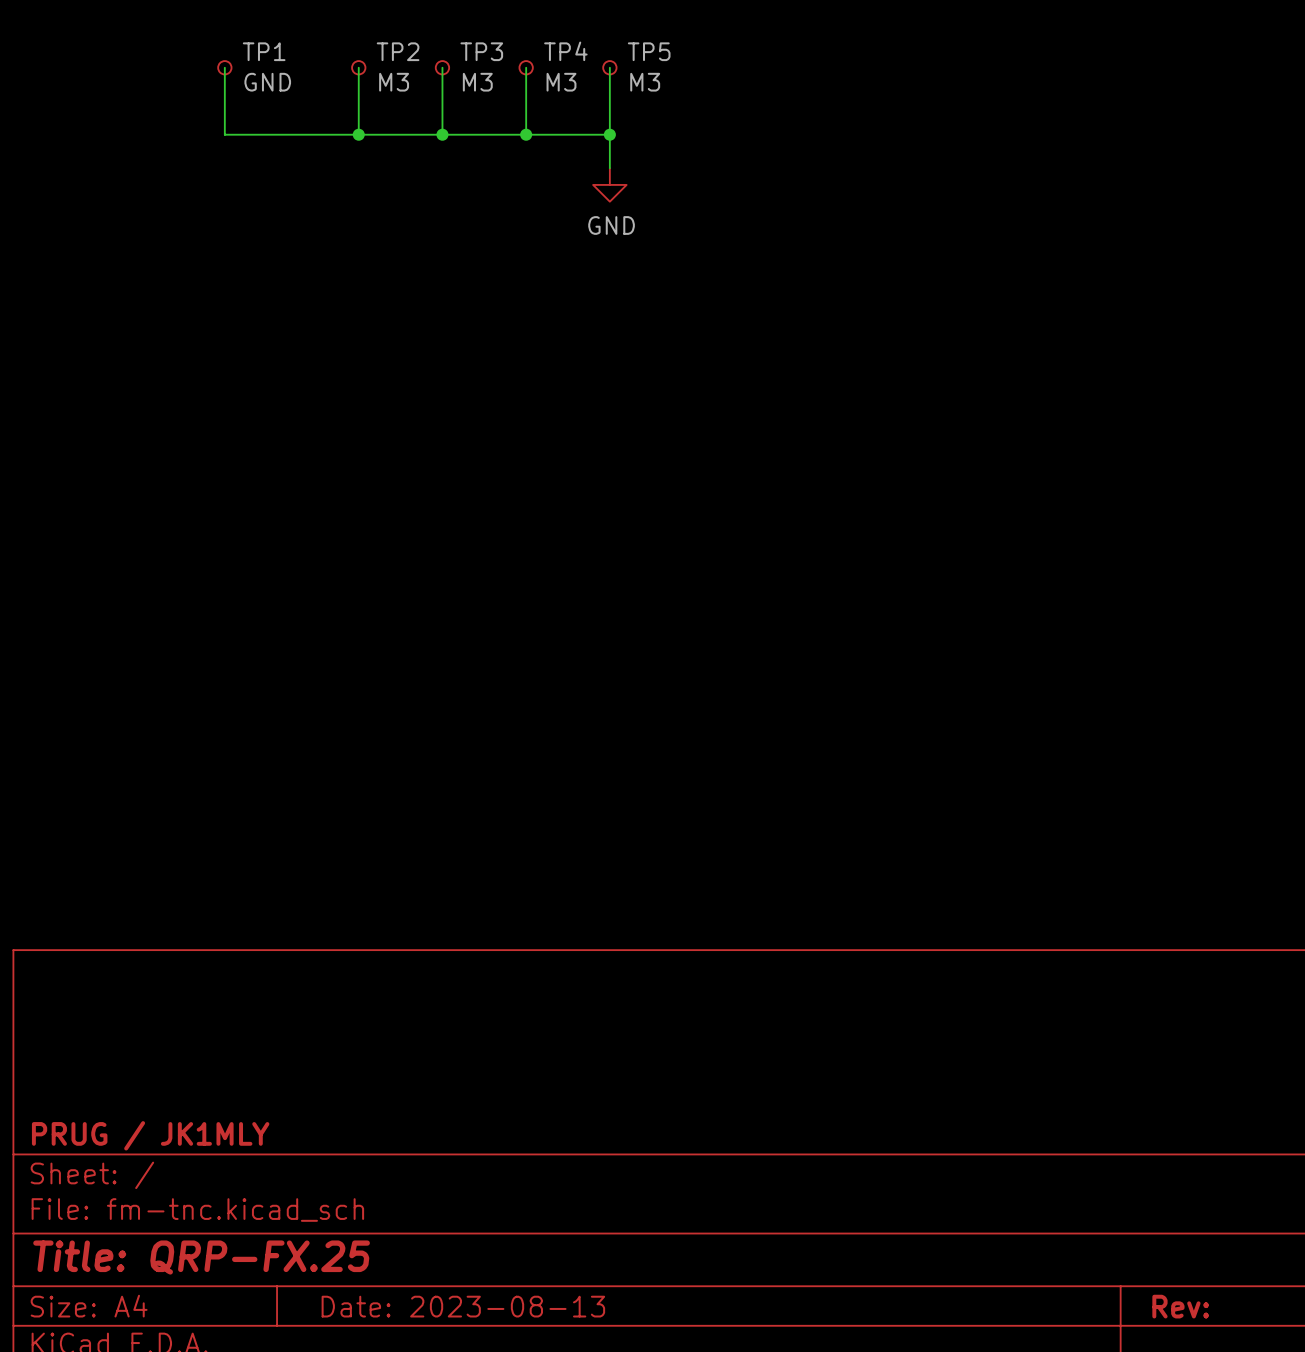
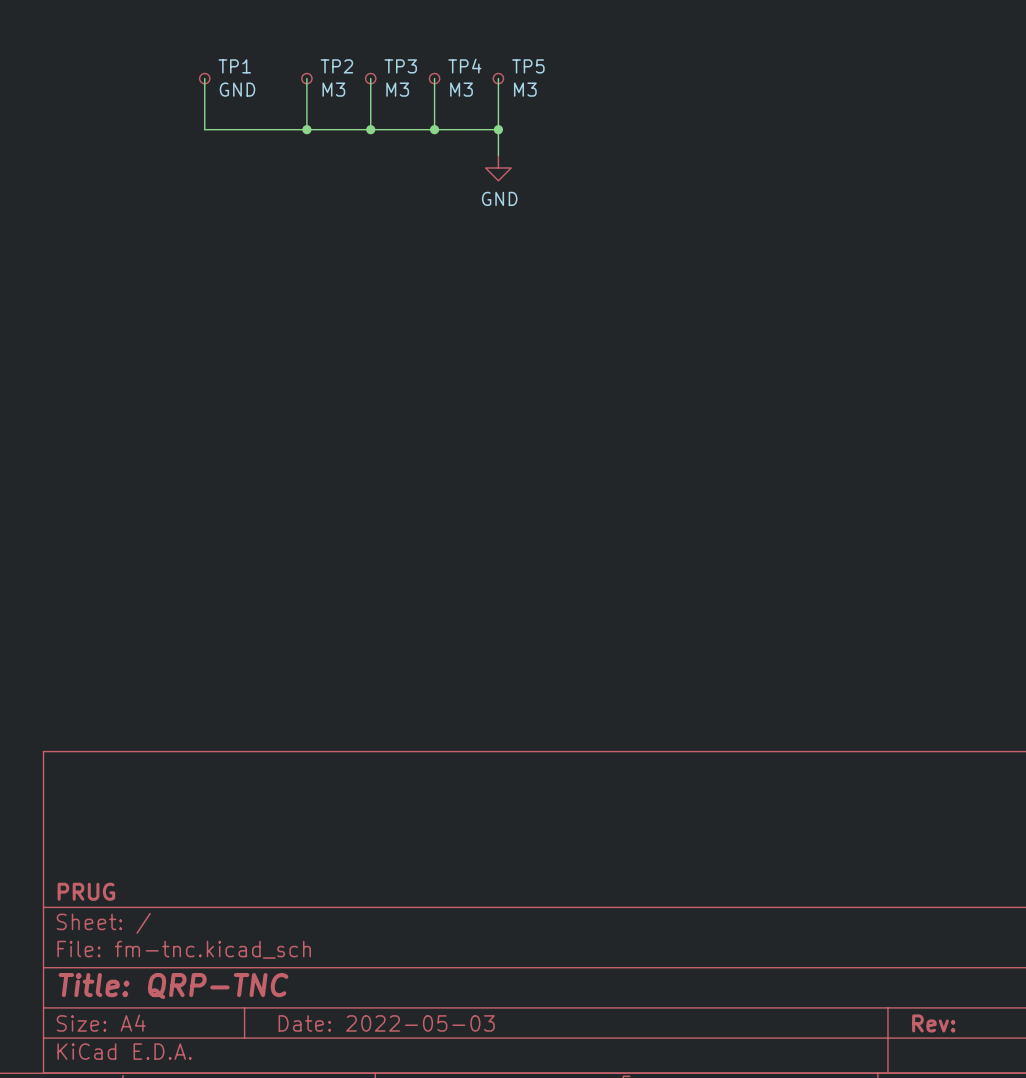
title block: PRUG / JK1MLY (150, 1135) -> PRUG (86, 891)
title block: Title: QRP-FX.25 (201, 1257) -> Title: QRP-TNC (173, 986)
title block: Date: 2023-08-13 (463, 1306) -> Date: 2022-05-03 (386, 1023)

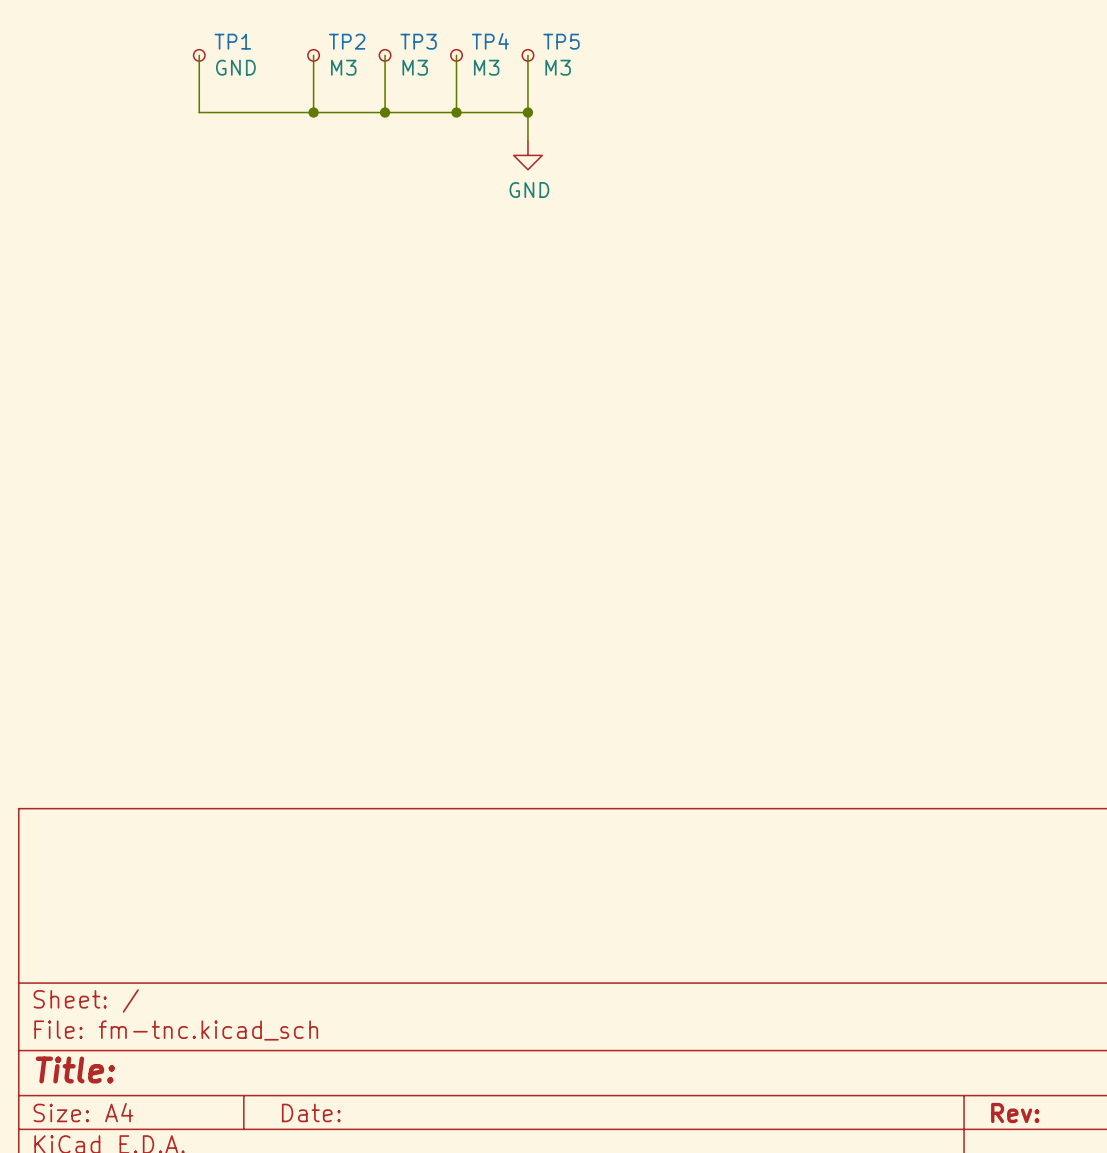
title block: PRUG (86, 891) -> none
title block: Title: QRP-TNC (173, 986) -> Title: (75, 1070)
title block: Date: 2022-05-03 (386, 1023) -> Date: (311, 1112)

